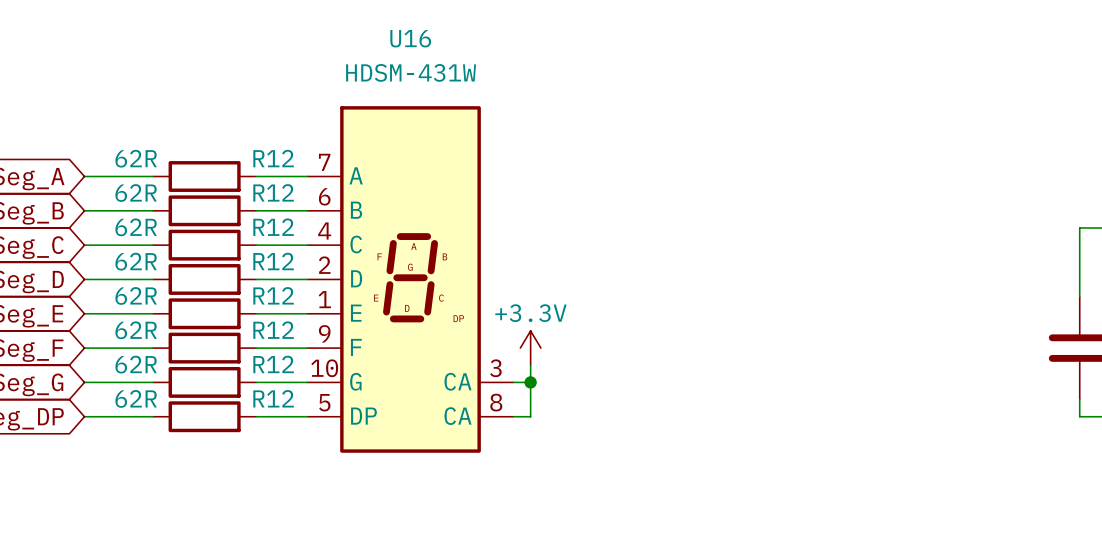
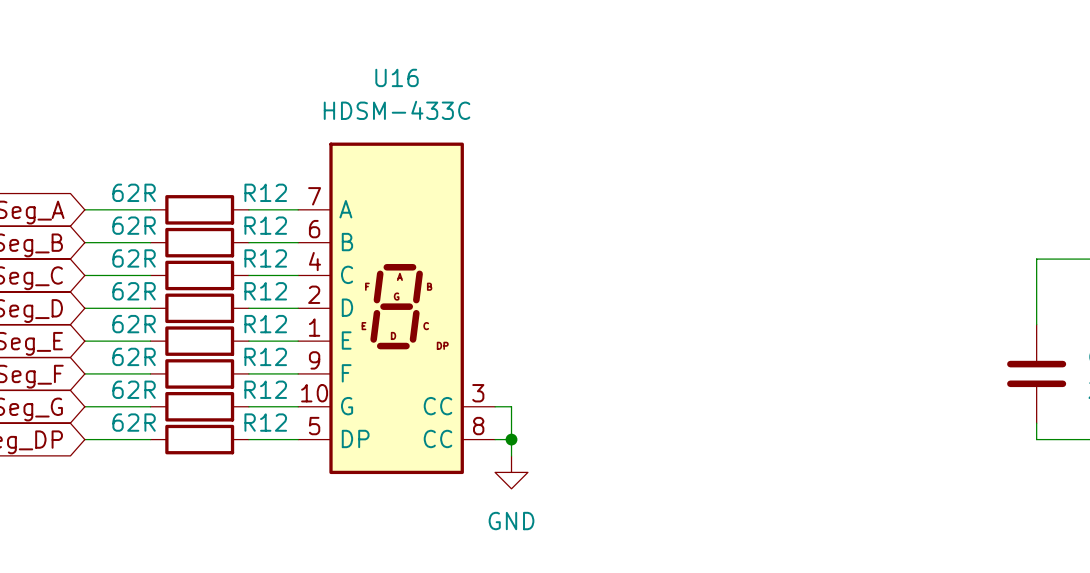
U16 value: HDSM-431W (411, 72) -> HDSM-433C (397, 110)
power symbol: +3.3V (530, 348) -> none
wire: (530, 365) (530, 382) -> (511, 439) (511, 456)
U16 pin name: CA (458, 381) -> CC (438, 406)
junction position: (530, 382) -> (511, 439)
U16 pin name: CA (458, 416) -> CC (438, 438)
power symbol: none -> GND (511, 472)

